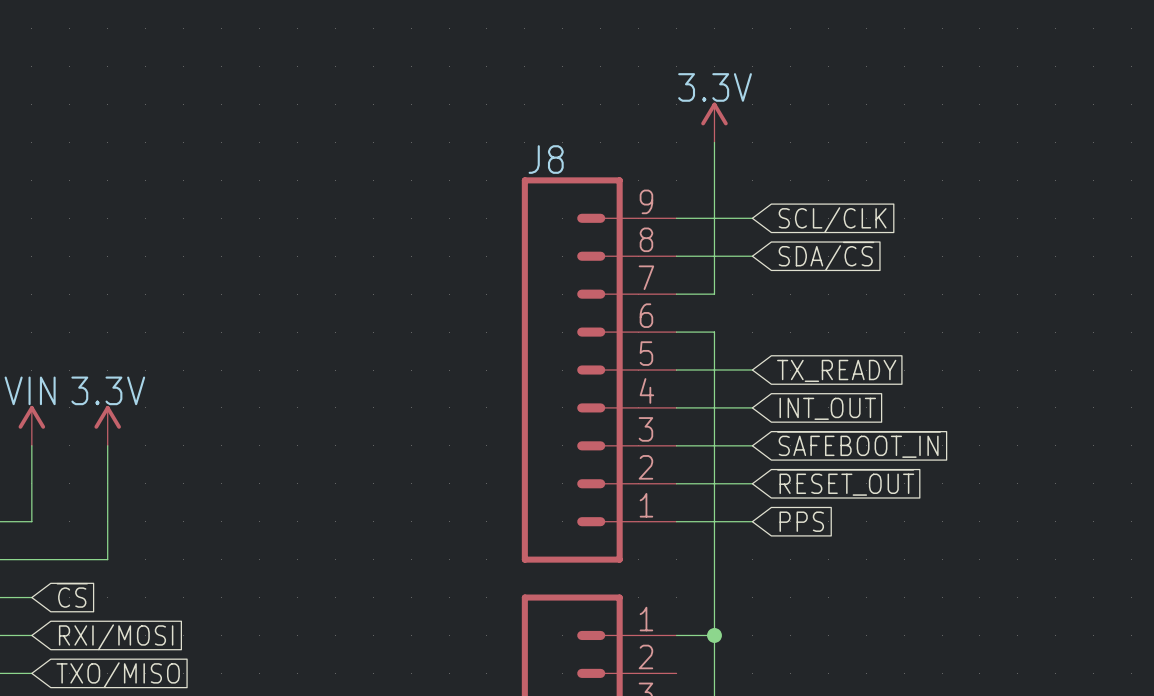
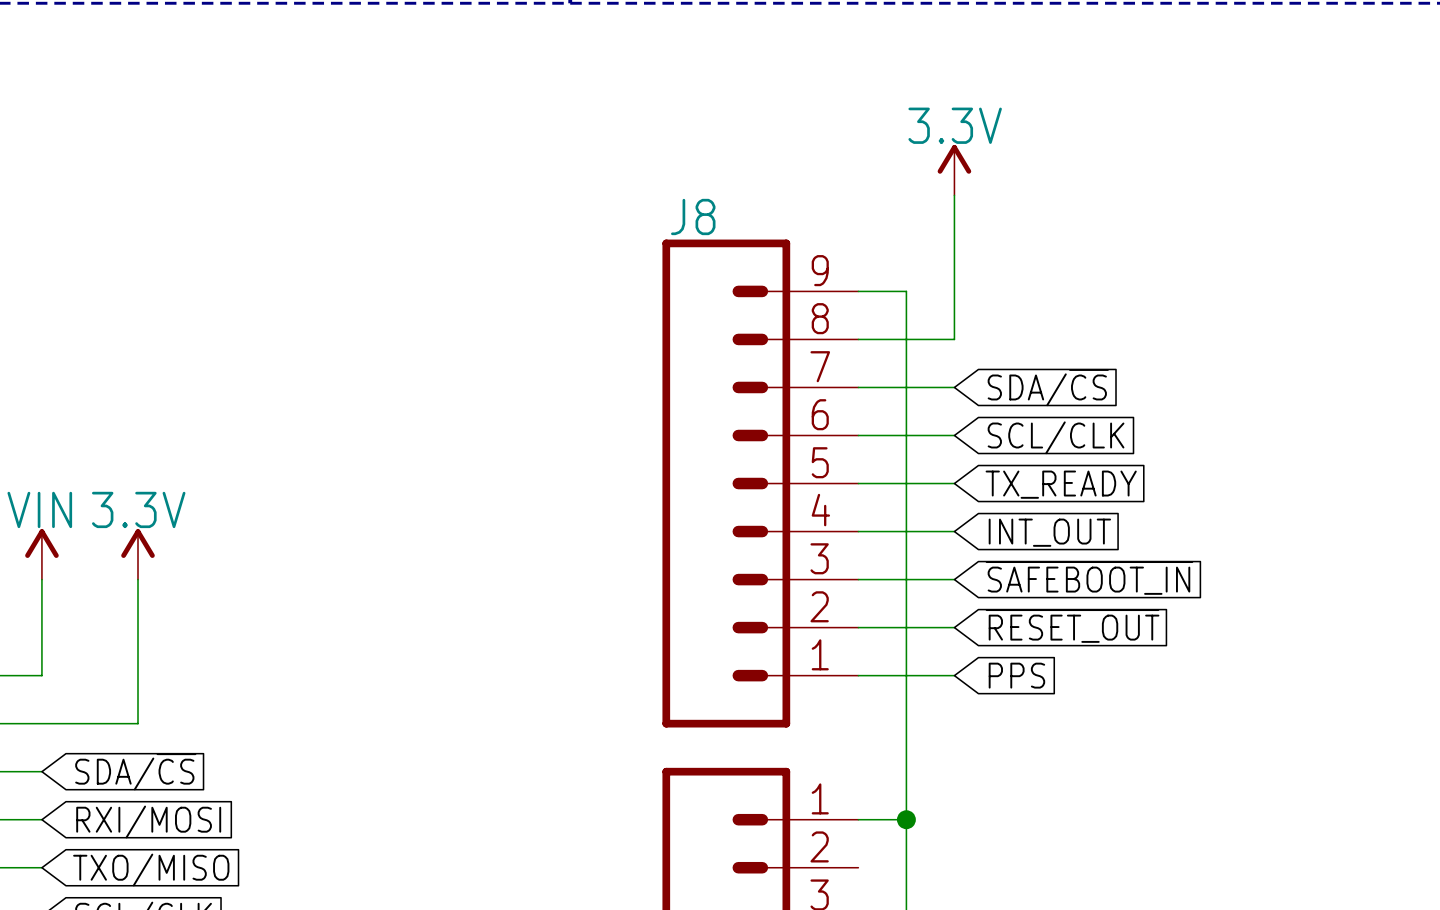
power symbol position: 3.3V (714, 122) -> 3.3V (954, 170)
wire: (714, 142) (714, 218) (752, 218) -> none
wire: none -> (954, 195) (954, 339)
global label position: SCL/CLK (832, 220) -> SCL/CLK (1056, 437)
global label position: SDA/~{CS} (826, 256) -> SDA/~{CS} (1048, 387)
wire: none -> (954, 387) (906, 387) (906, 435) (954, 435)
global label: ~{CS} (72, 595) -> SDA/~{CS} (135, 771)

